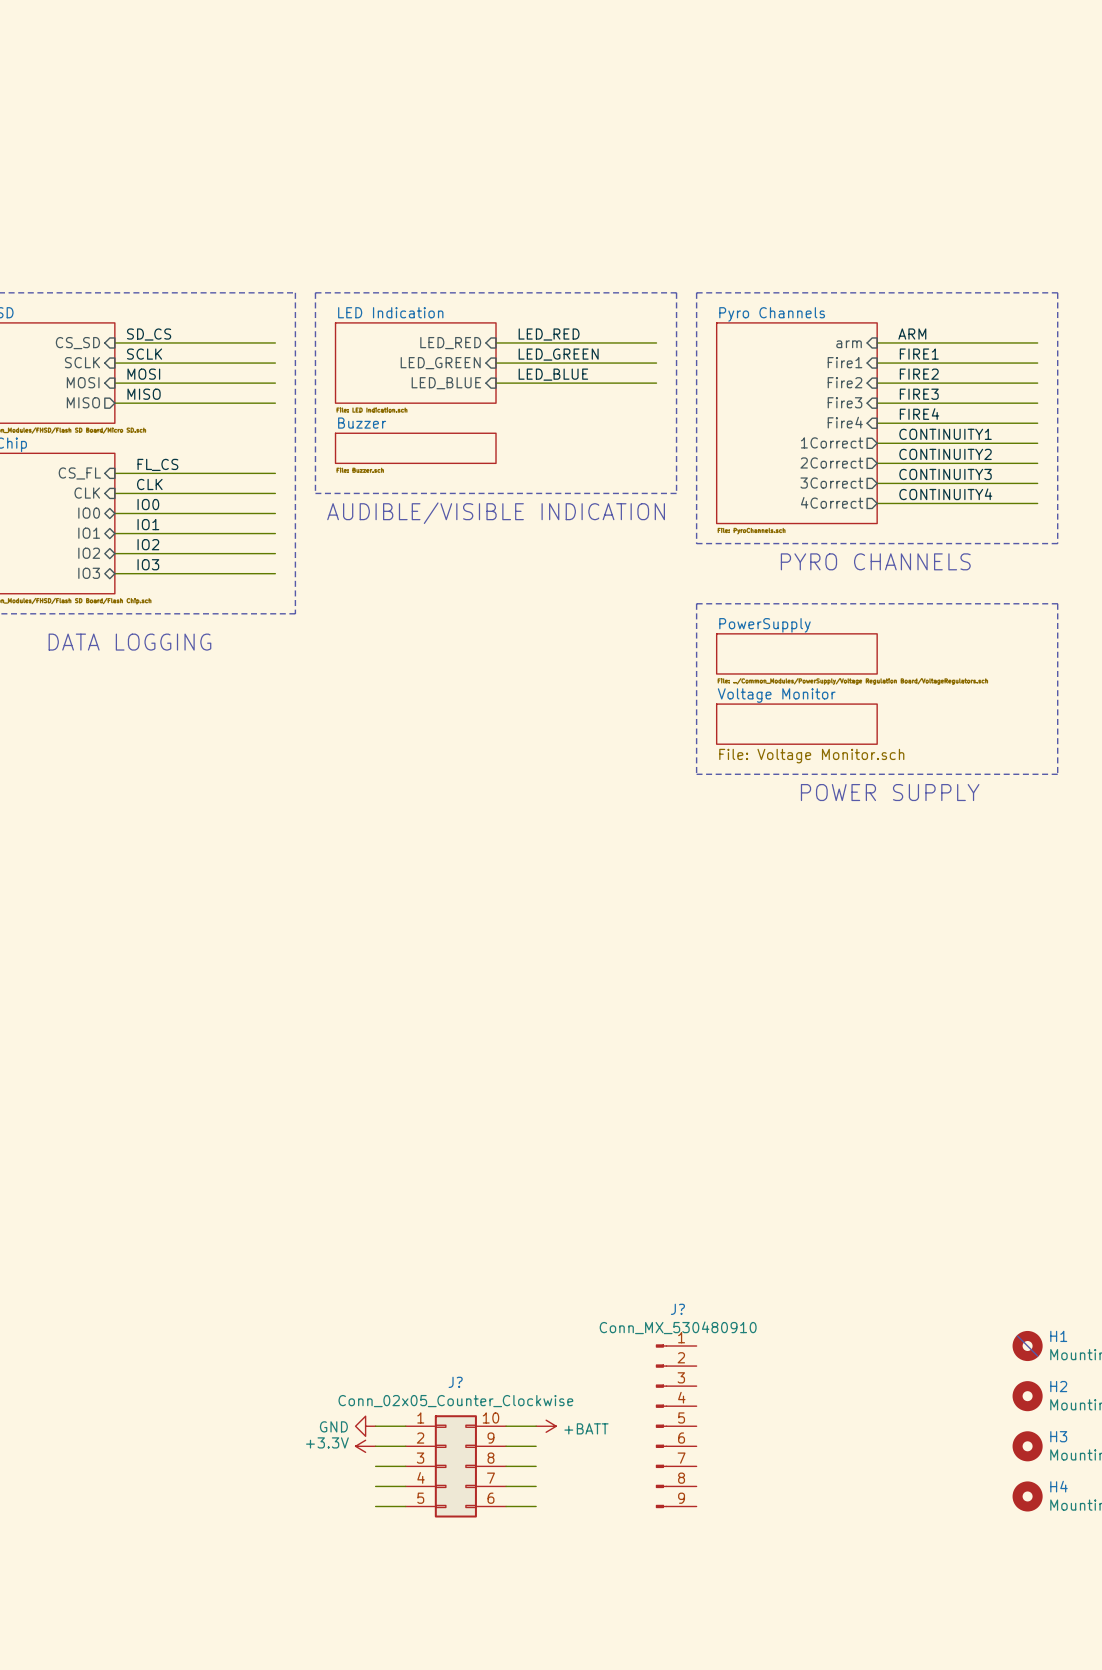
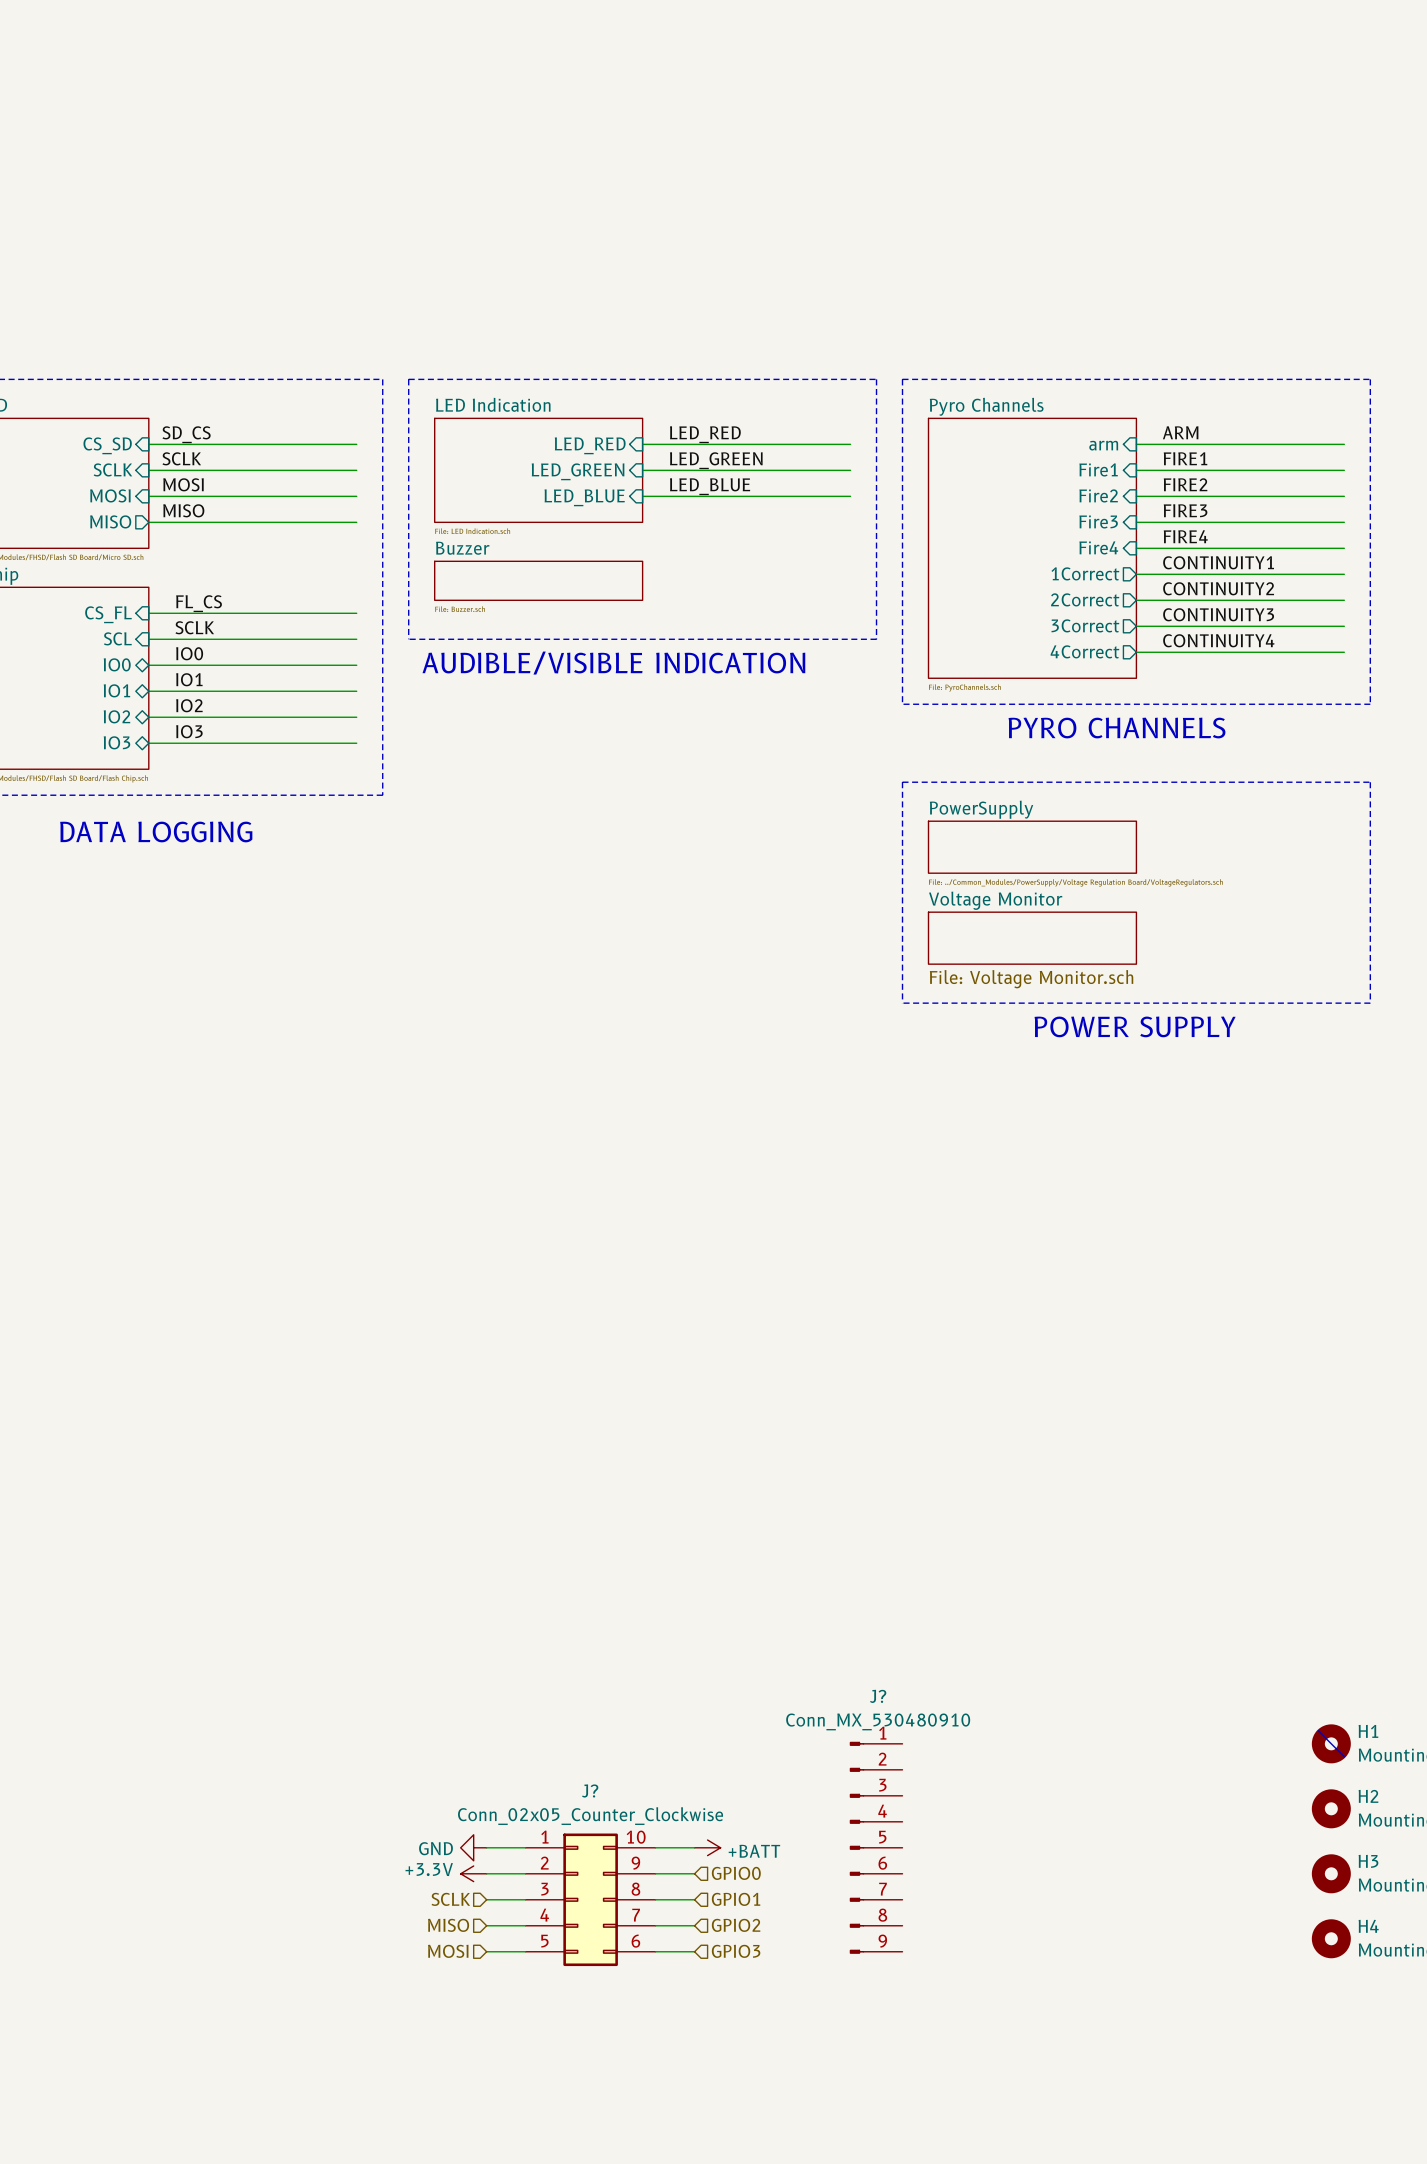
label: CLK (149, 484) -> SCLK (194, 627)
sheet pin: CLK (87, 493) -> SCL (117, 638)
hierarchical label: none -> GPIO0 (736, 1873)
hierarchical label: none -> SCLK (450, 1899)
hierarchical label: none -> GPIO1 (736, 1899)
hierarchical label: none -> MISO (448, 1925)
hierarchical label: none -> GPIO2 (736, 1925)
hierarchical label: none -> MOSI (448, 1951)
hierarchical label: none -> GPIO3 (736, 1951)

